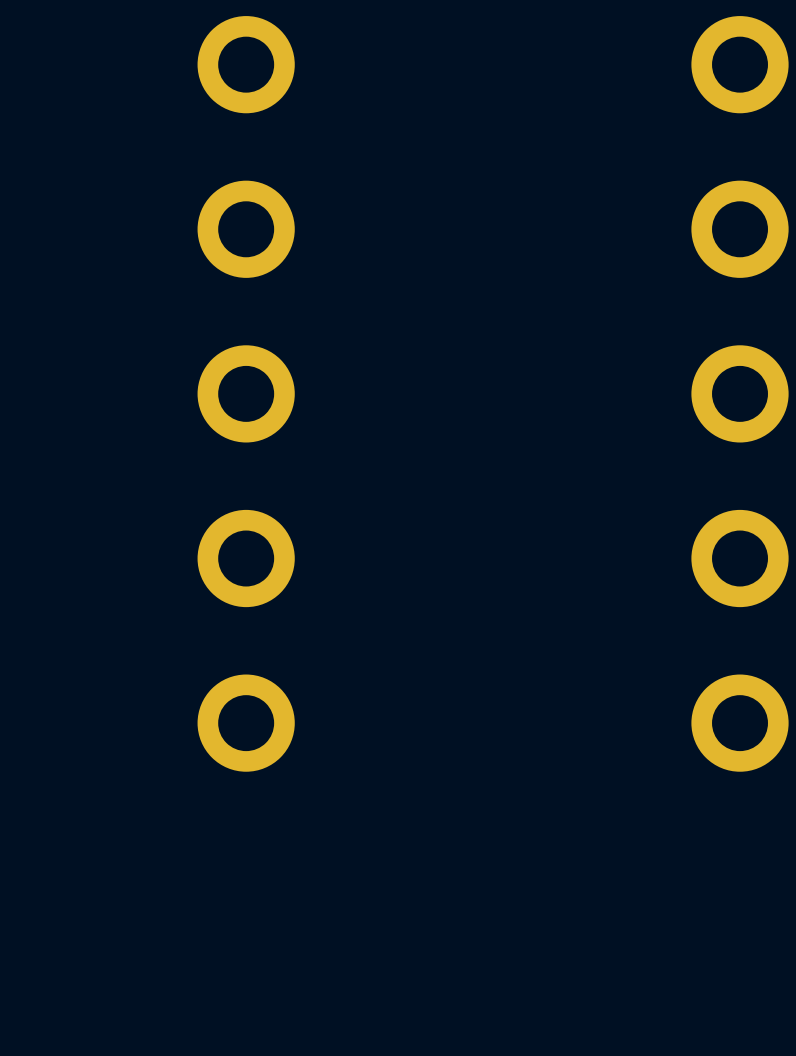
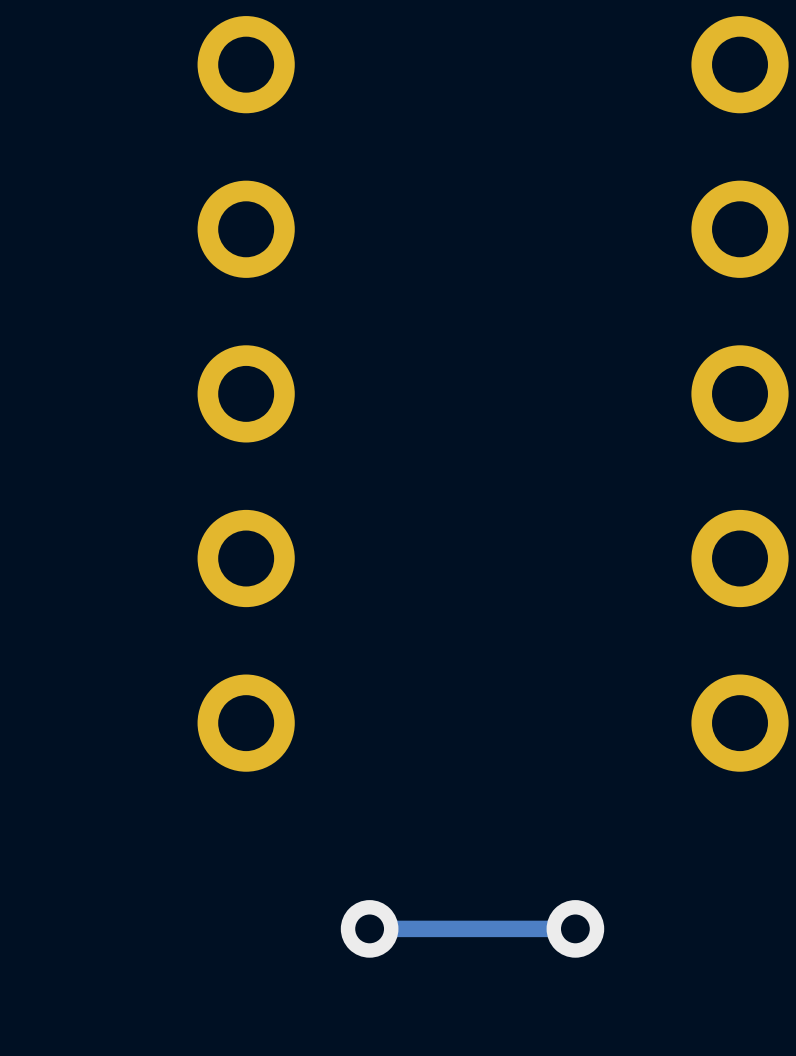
via: none -> (369, 928)
track: none -> (575, 928) (369, 928)
via: none -> (575, 928)

